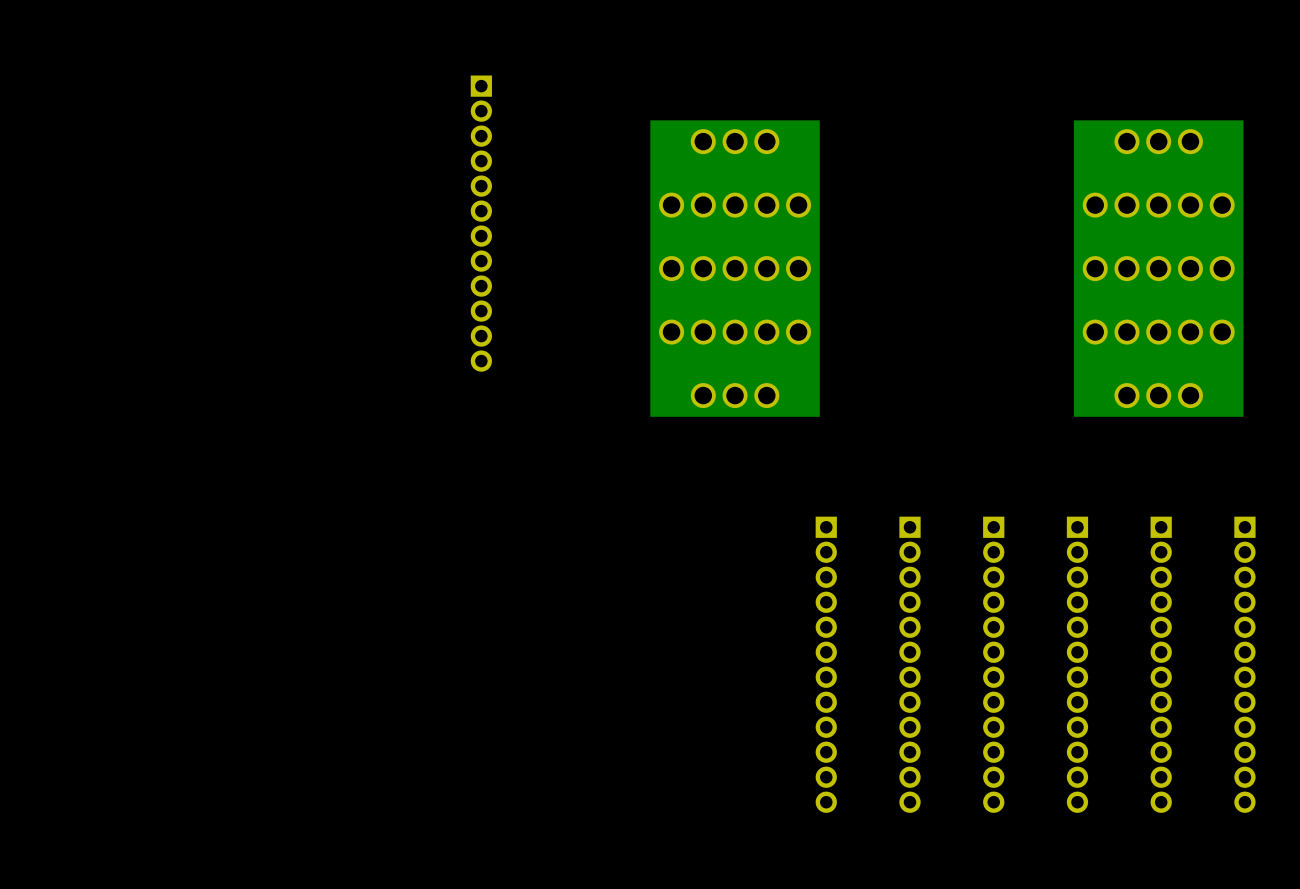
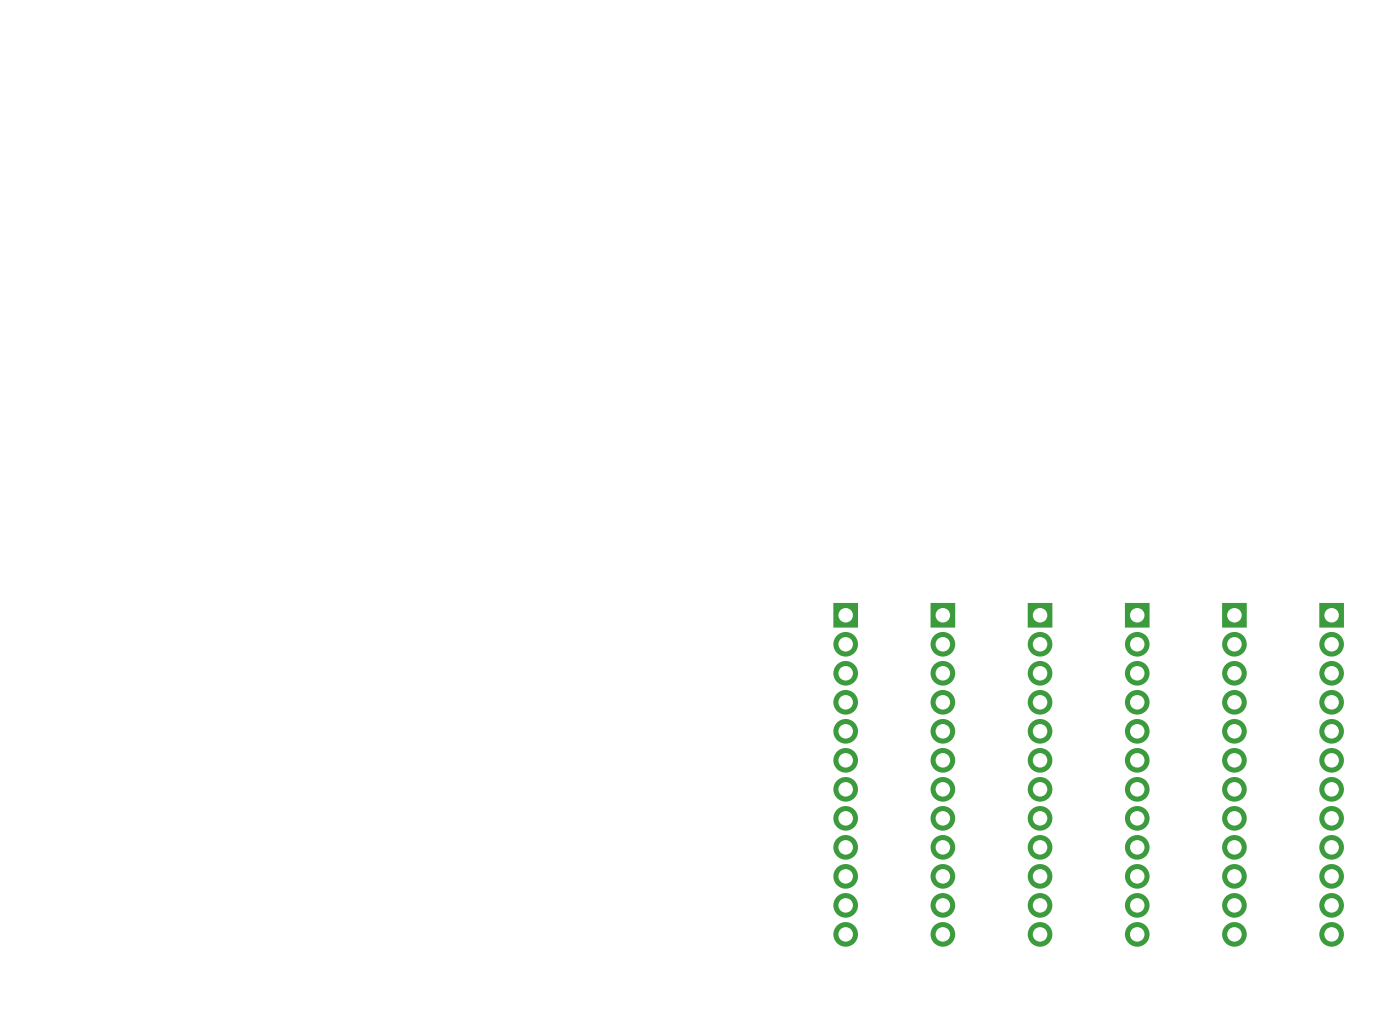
part: (481, 223) -> none
part: (735, 268) -> none
part: (1158, 268) -> none

